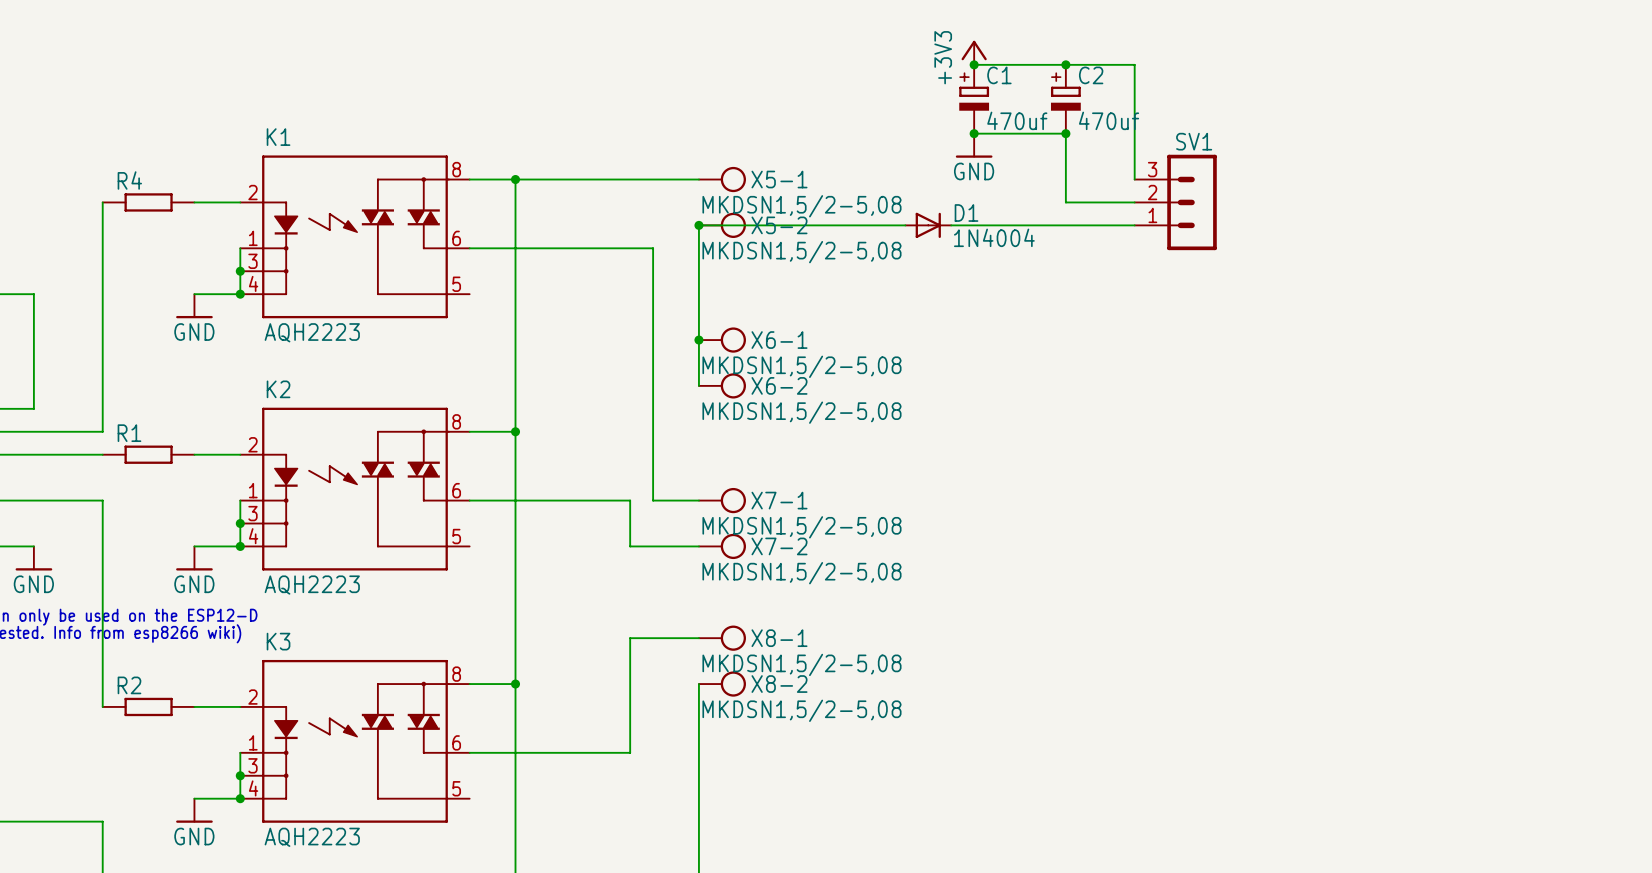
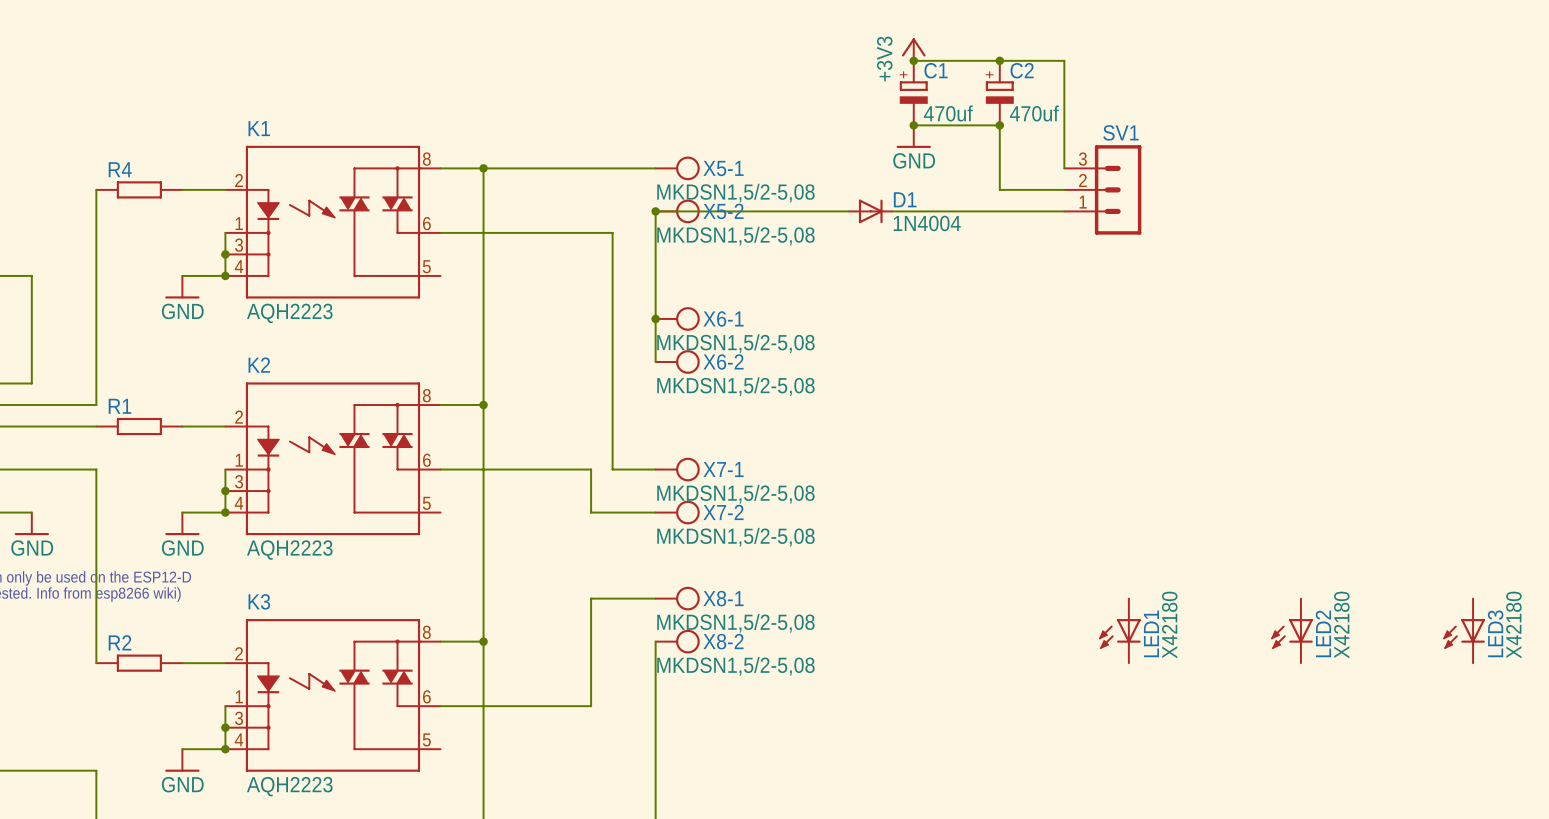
LED1: none -> X42180 (1119, 630)
LED2: none -> X42180 (1292, 630)
LED3: none -> X42180 (1464, 630)

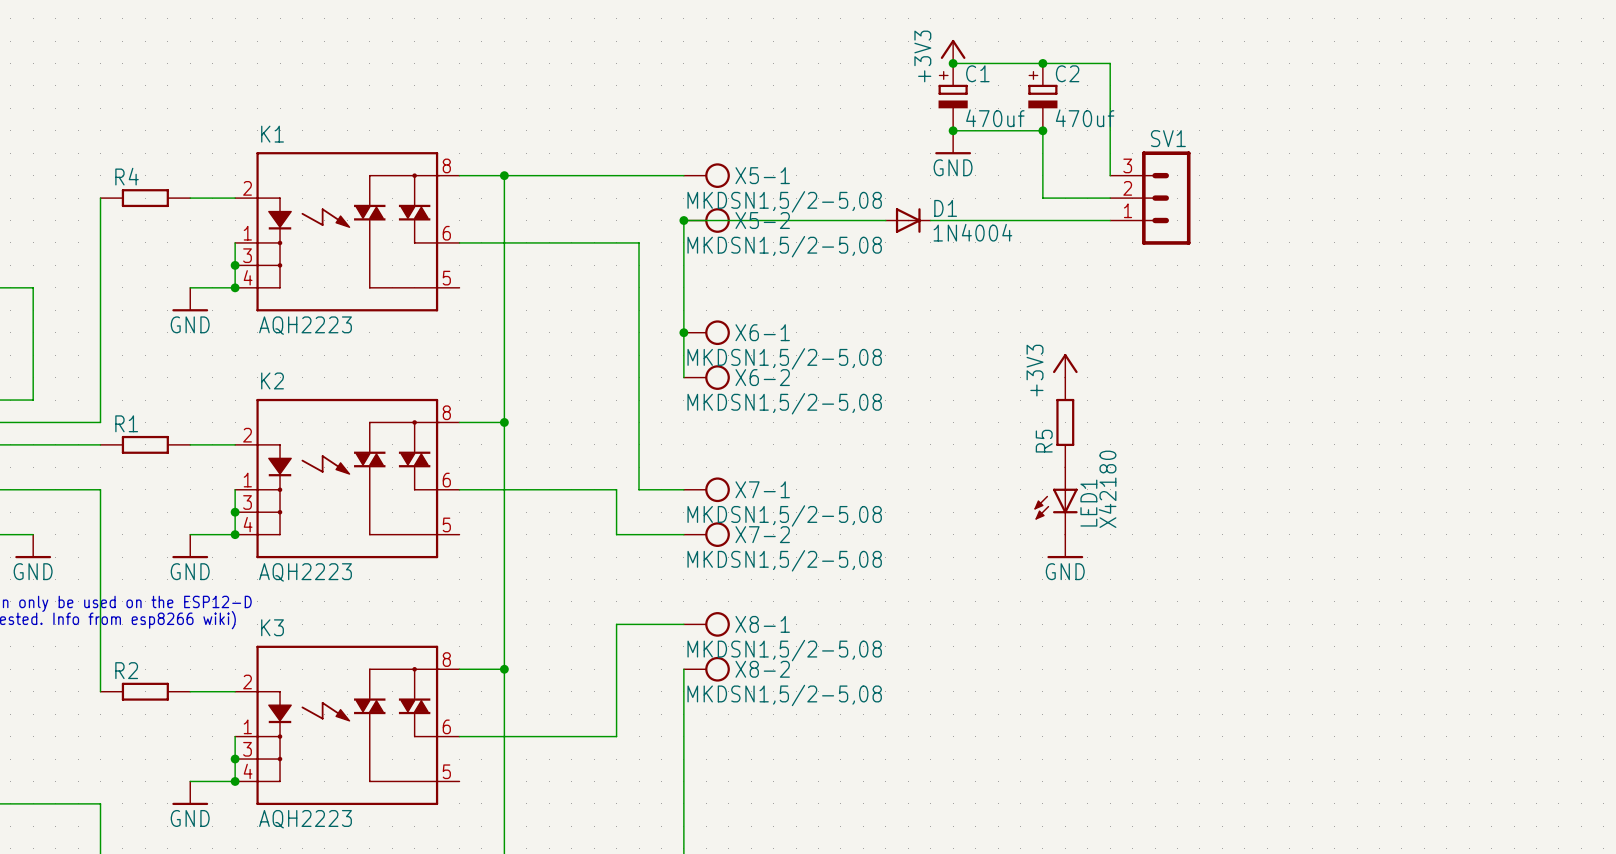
power symbol: none -> +3V3 (1065, 365)
R5: none -> (1065, 422)
power symbol: none -> GND (1065, 546)
LED1 position: (1119, 630) -> (1056, 500)
LED2: X42180 (1292, 630) -> none
LED3: X42180 (1464, 630) -> none

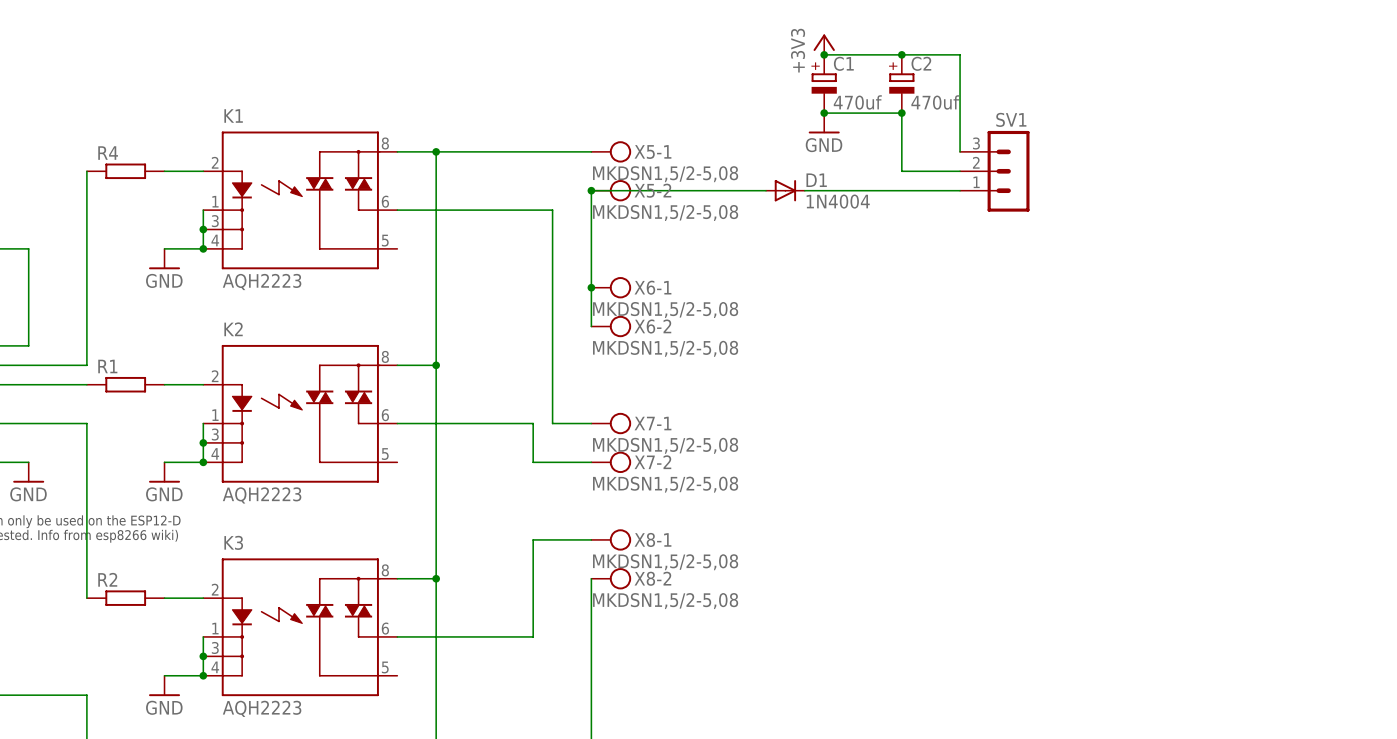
power symbol: +3V3 (1065, 365) -> none
R5: (1065, 422) -> none
LED1: X42180 (1056, 500) -> none
power symbol: GND (1065, 546) -> none

